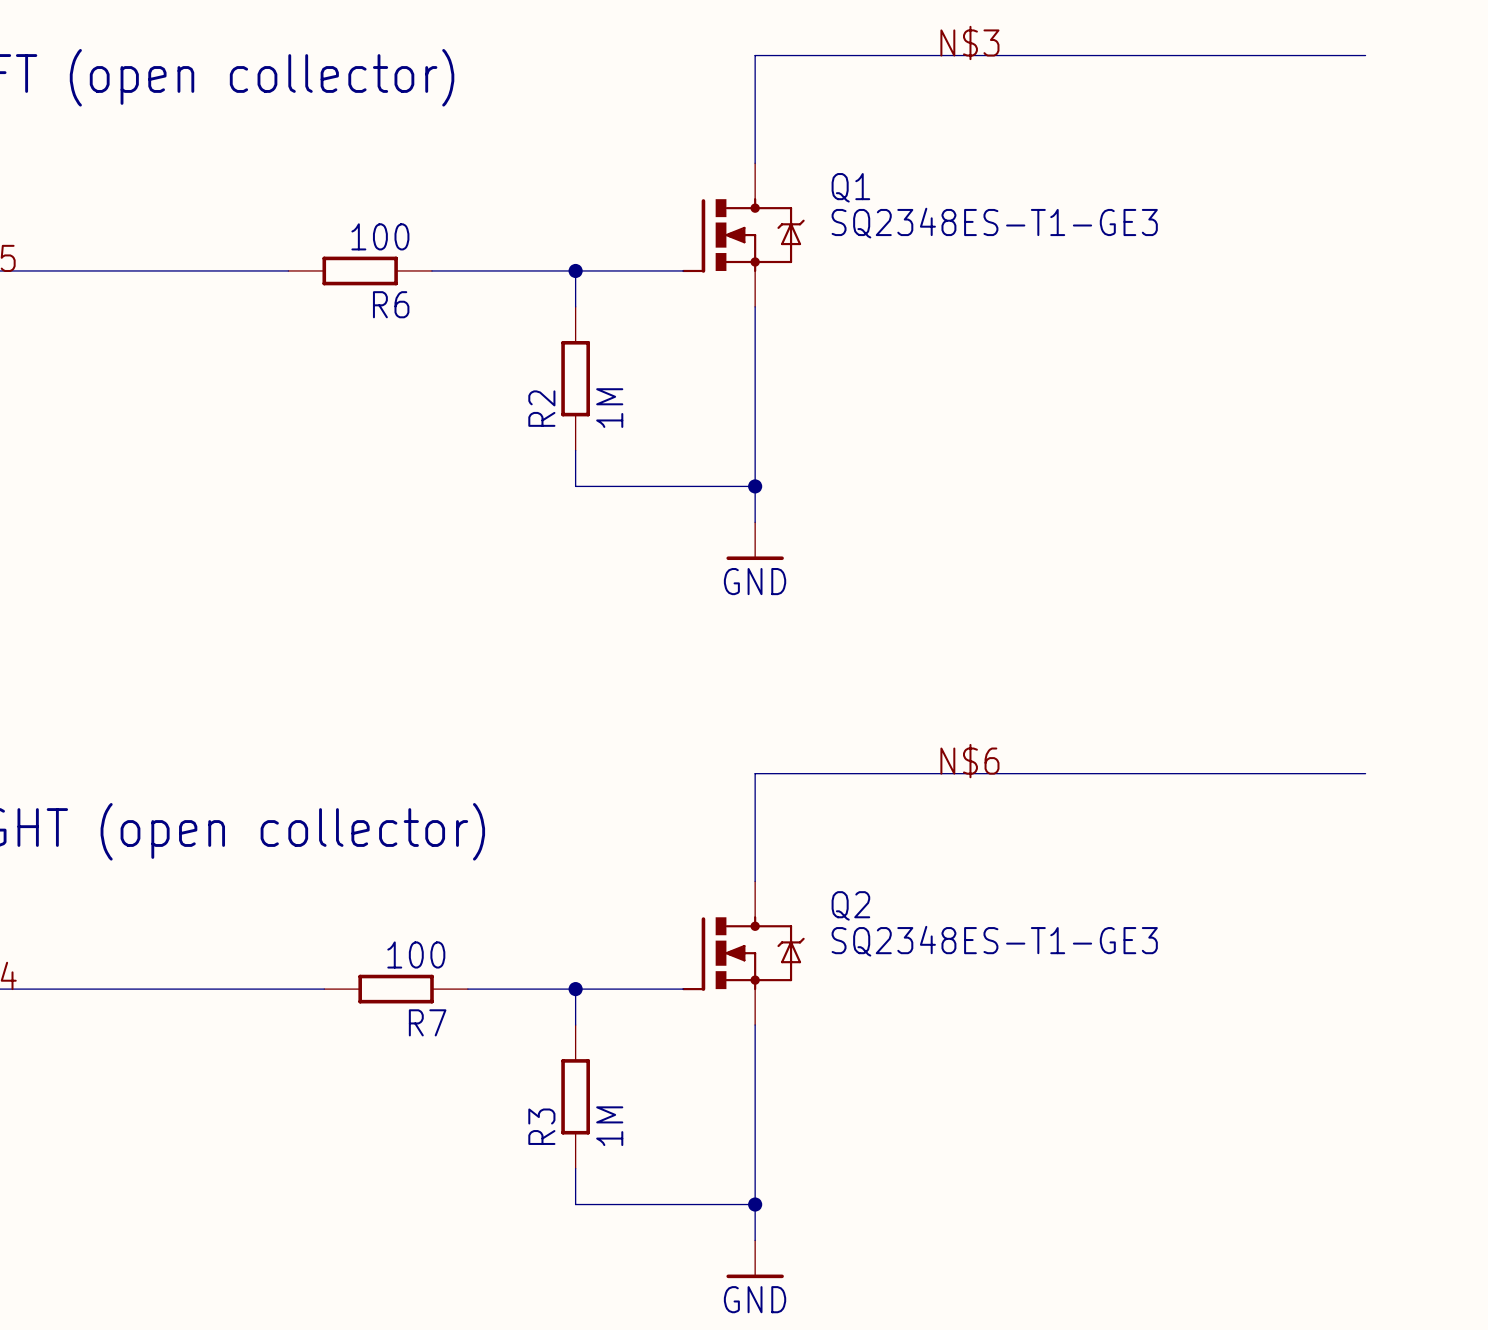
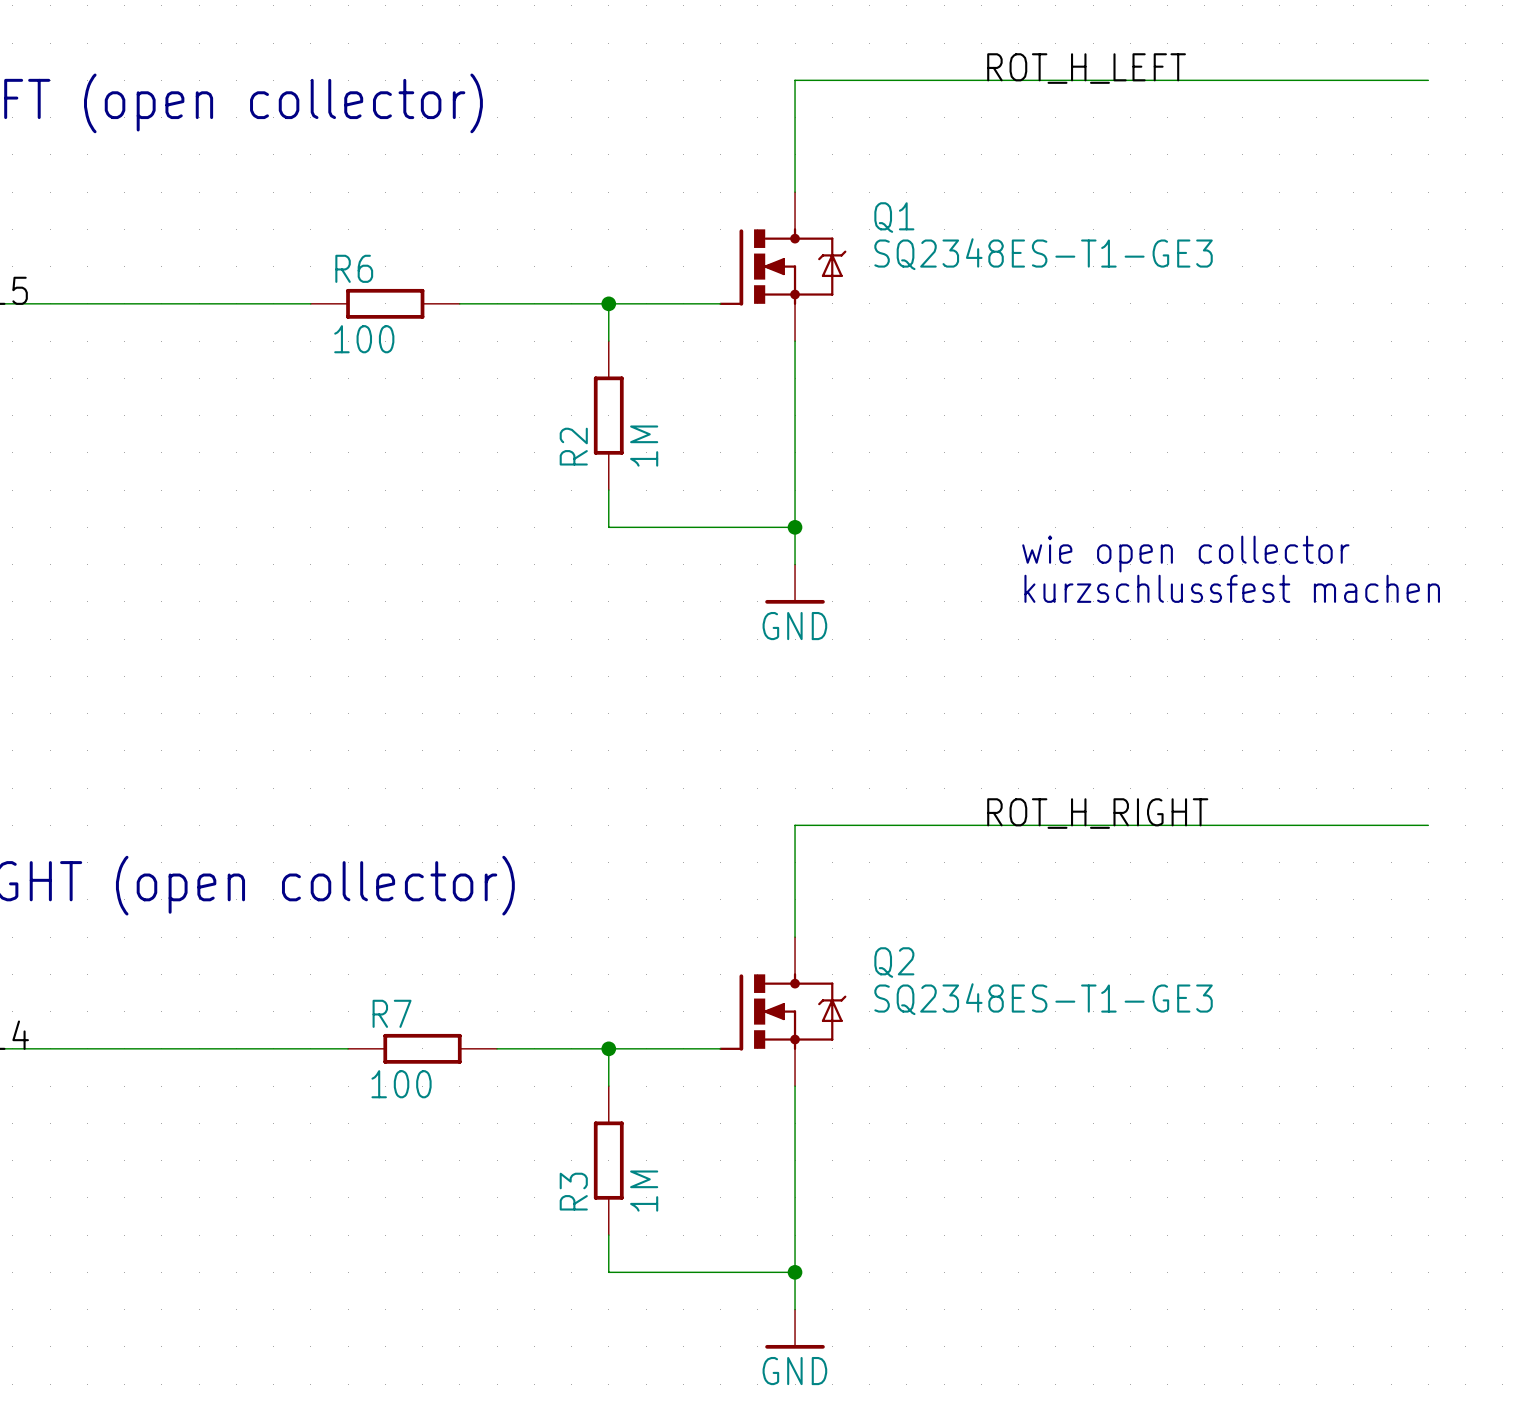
label: N$3 (969, 42) -> ROT_H_LEFT (1086, 68)
R6 value position: 100 (380, 236) -> 100 (364, 339)
R6 name position: R6 (391, 304) -> R6 (354, 268)
text: none -> wie open collector (1185, 554)
text: none -> kurzschlussfest machen (1232, 588)
label: N$6 (969, 761) -> ROT_H_RIGHT (1097, 813)
R7 value position: 100 (416, 954) -> 100 (401, 1084)
R7 name position: R7 (427, 1022) -> R7 (392, 1013)

